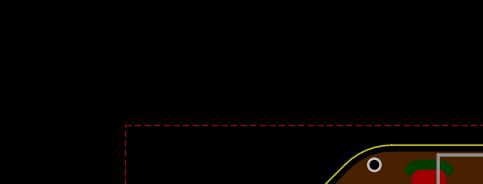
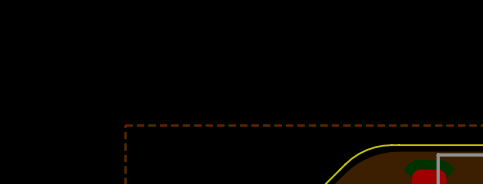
via: (374, 164) -> none

